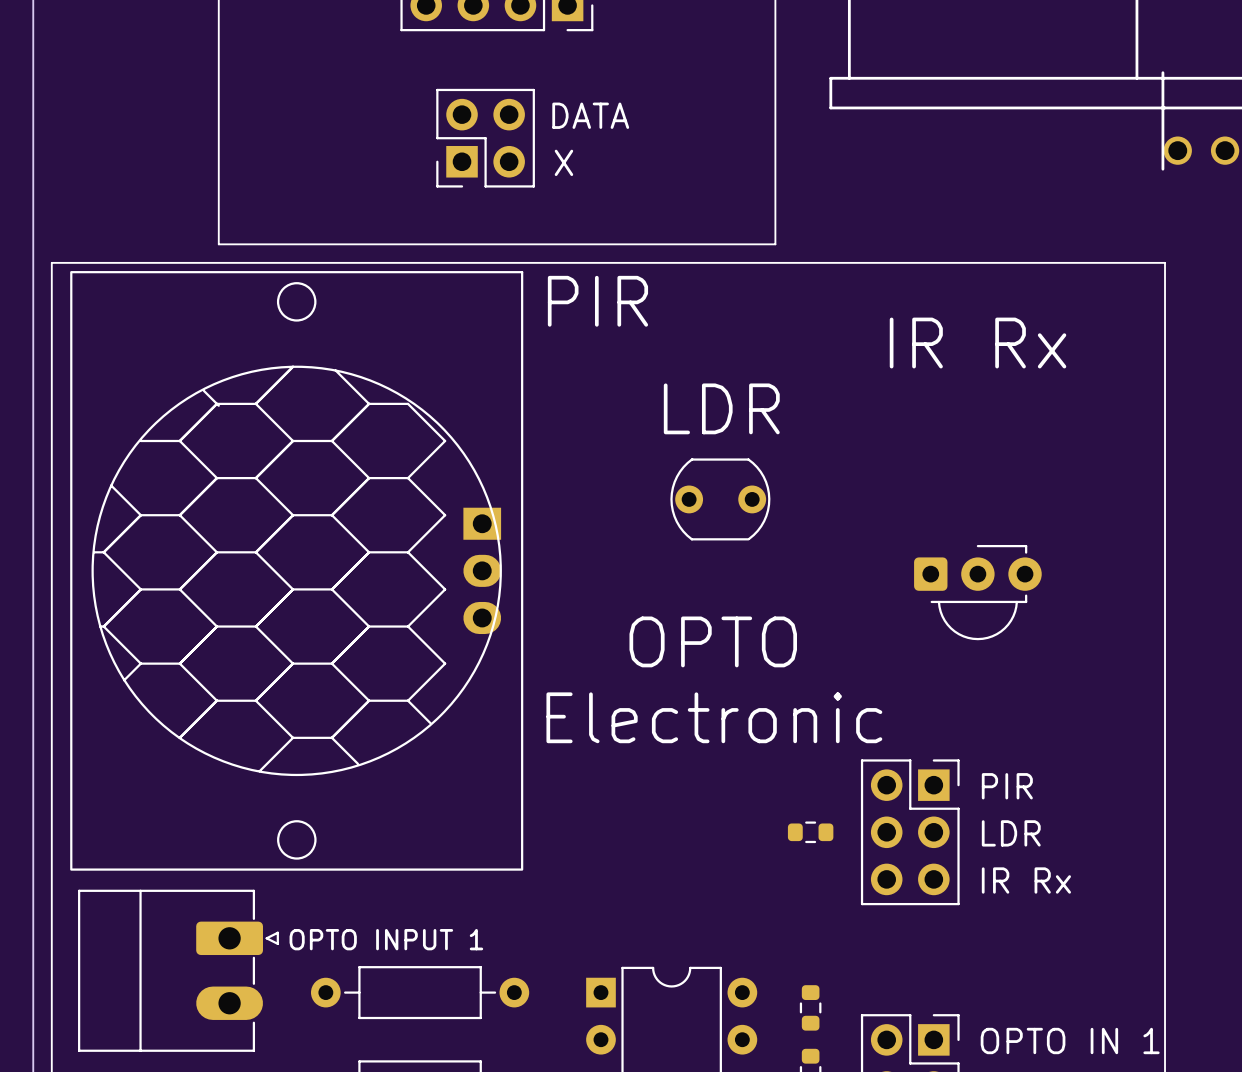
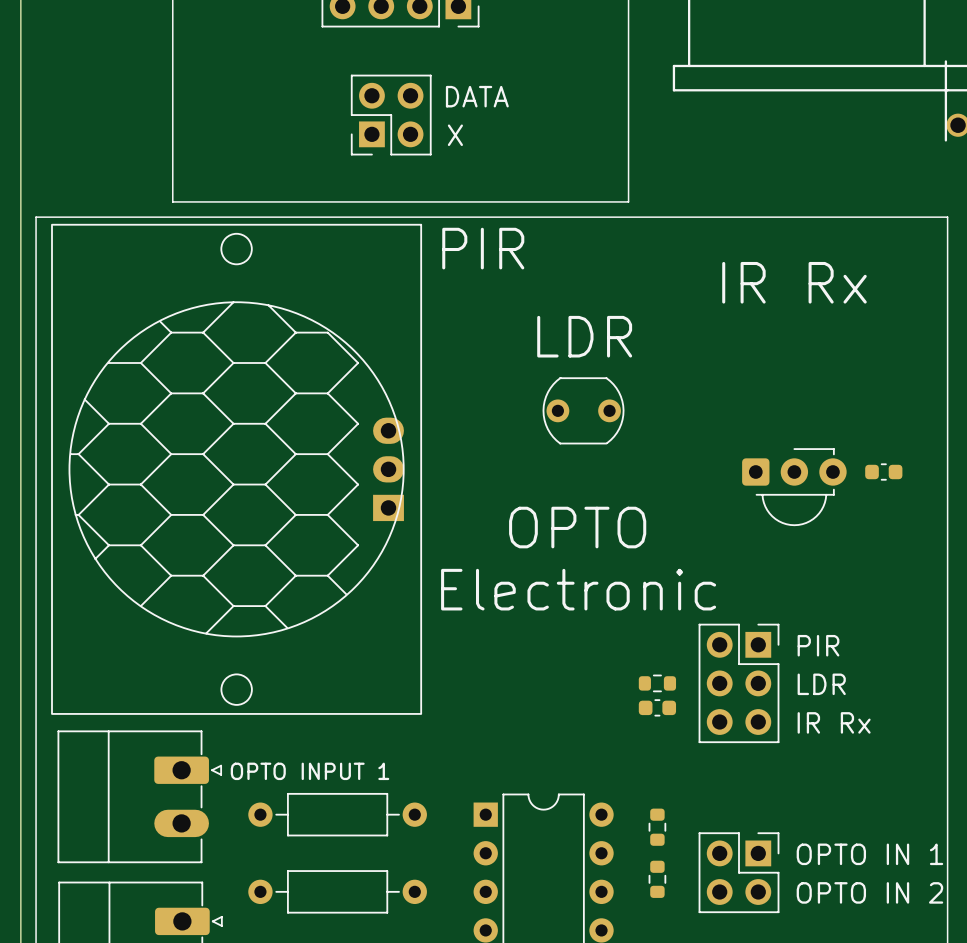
part footprint: [70, 271, 524, 871] -> [51, 223, 423, 715]
part: none -> (883, 472)
part: none -> (657, 707)

